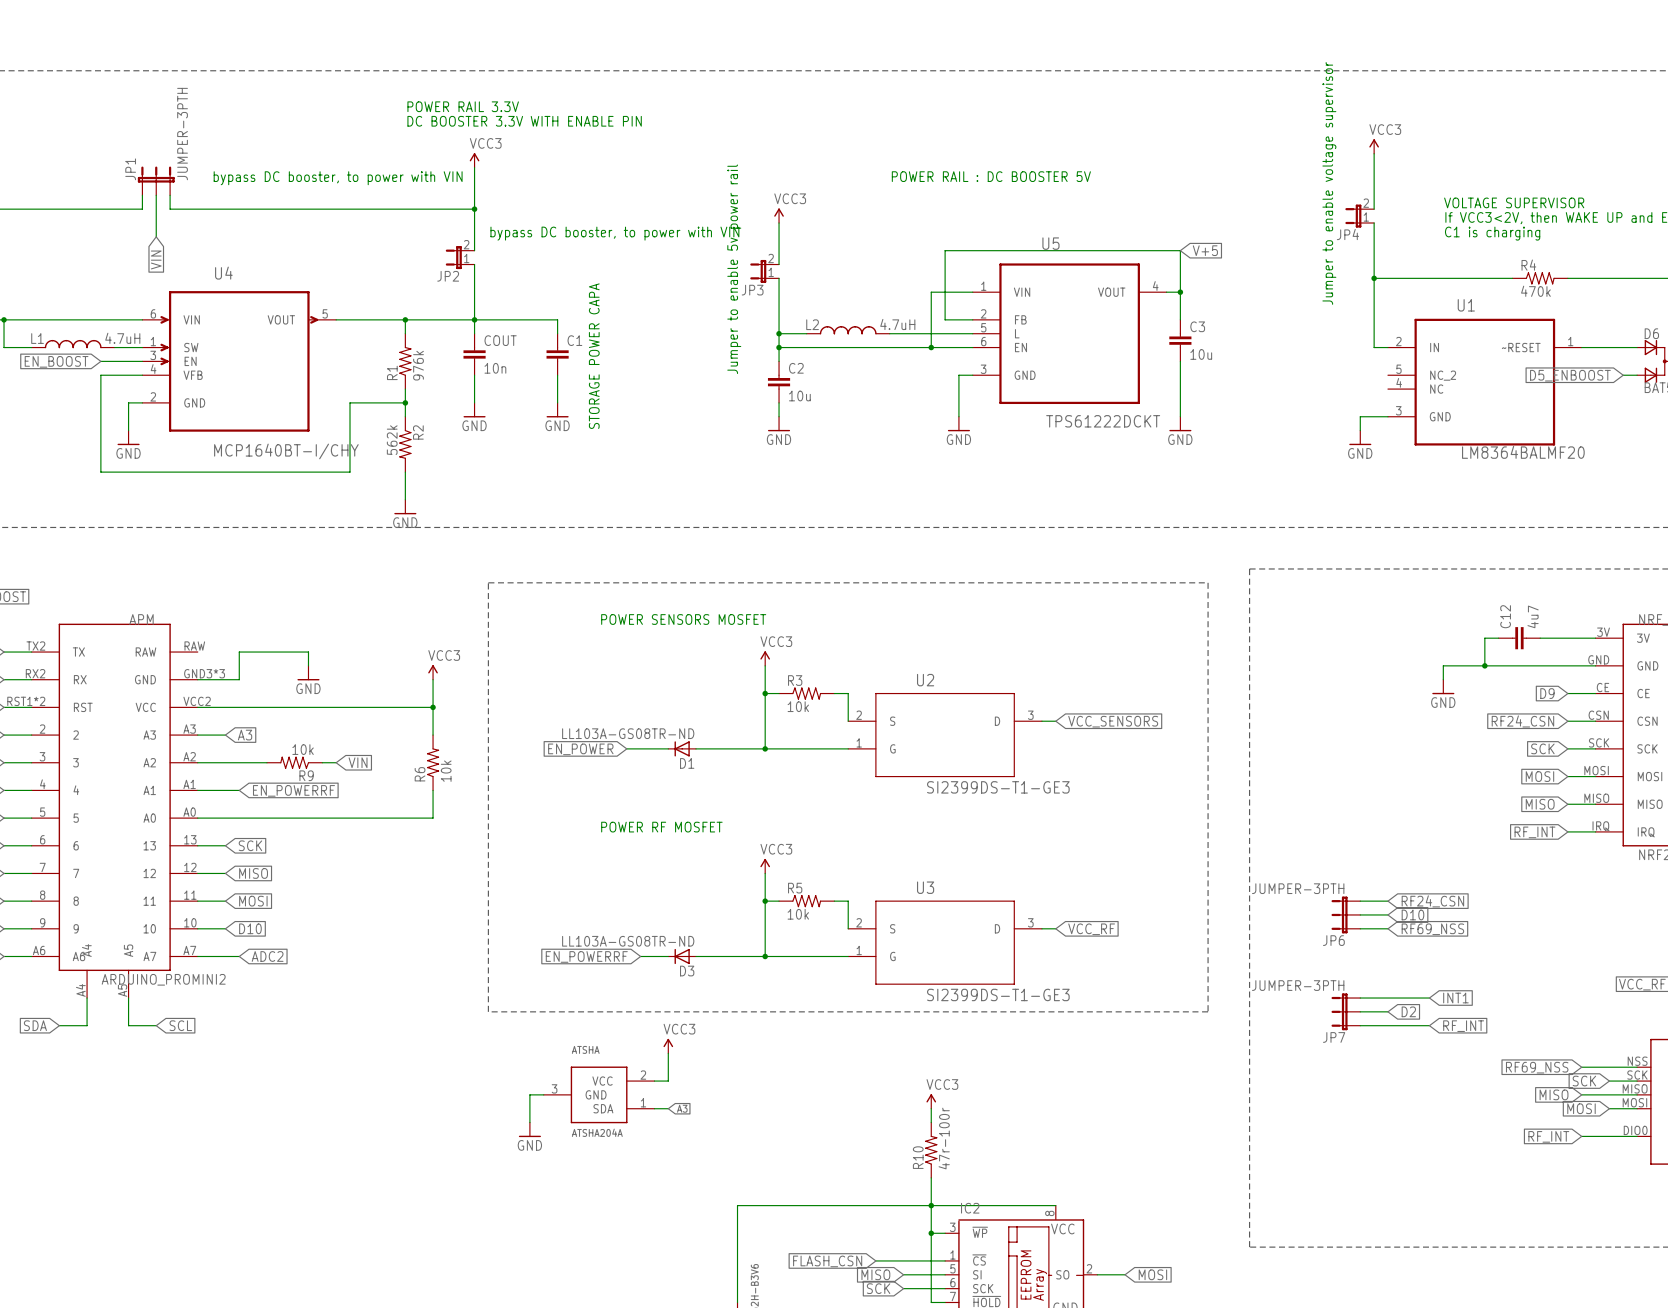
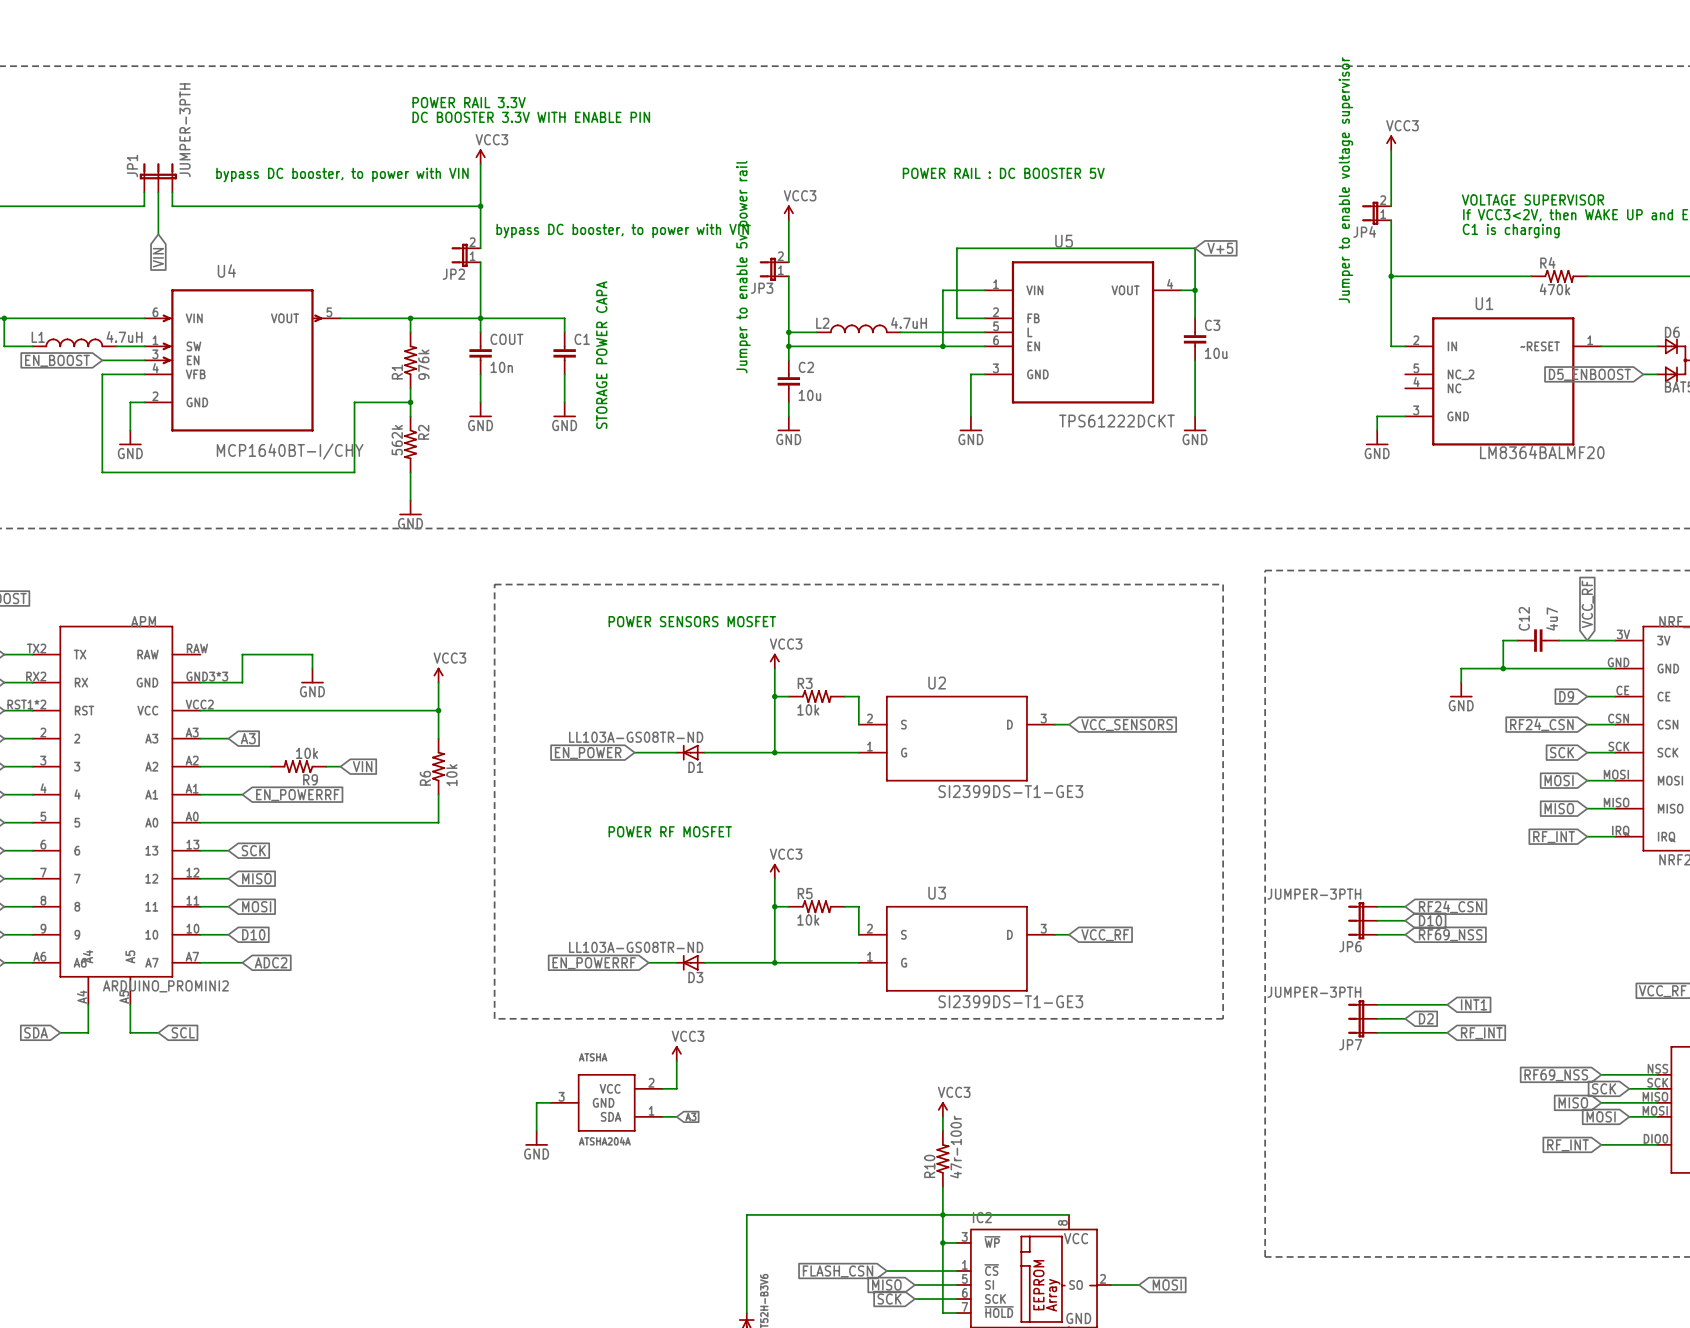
global label: none -> VCC_RF (1587, 604)

